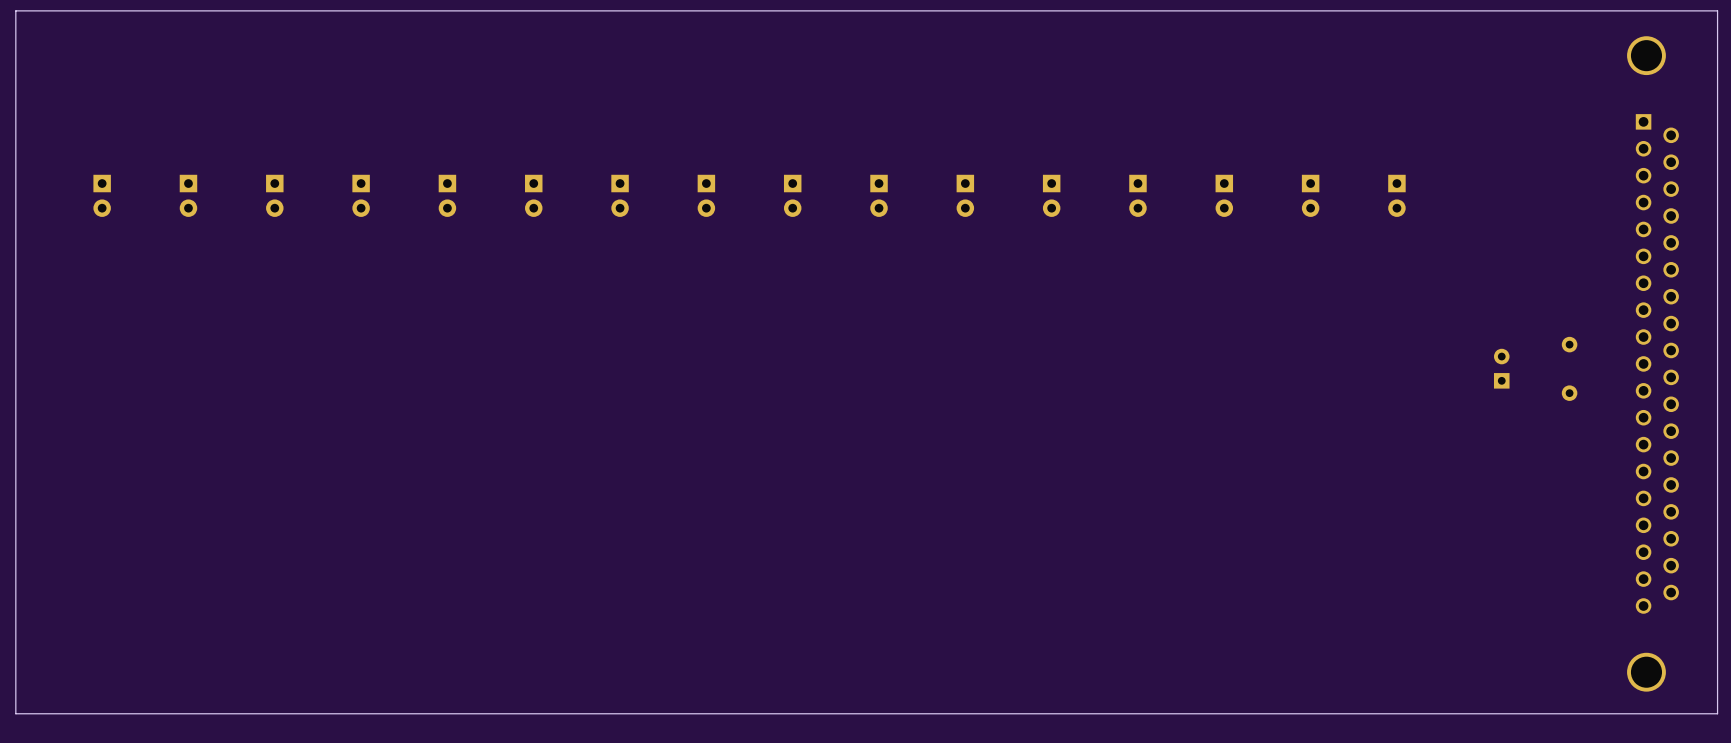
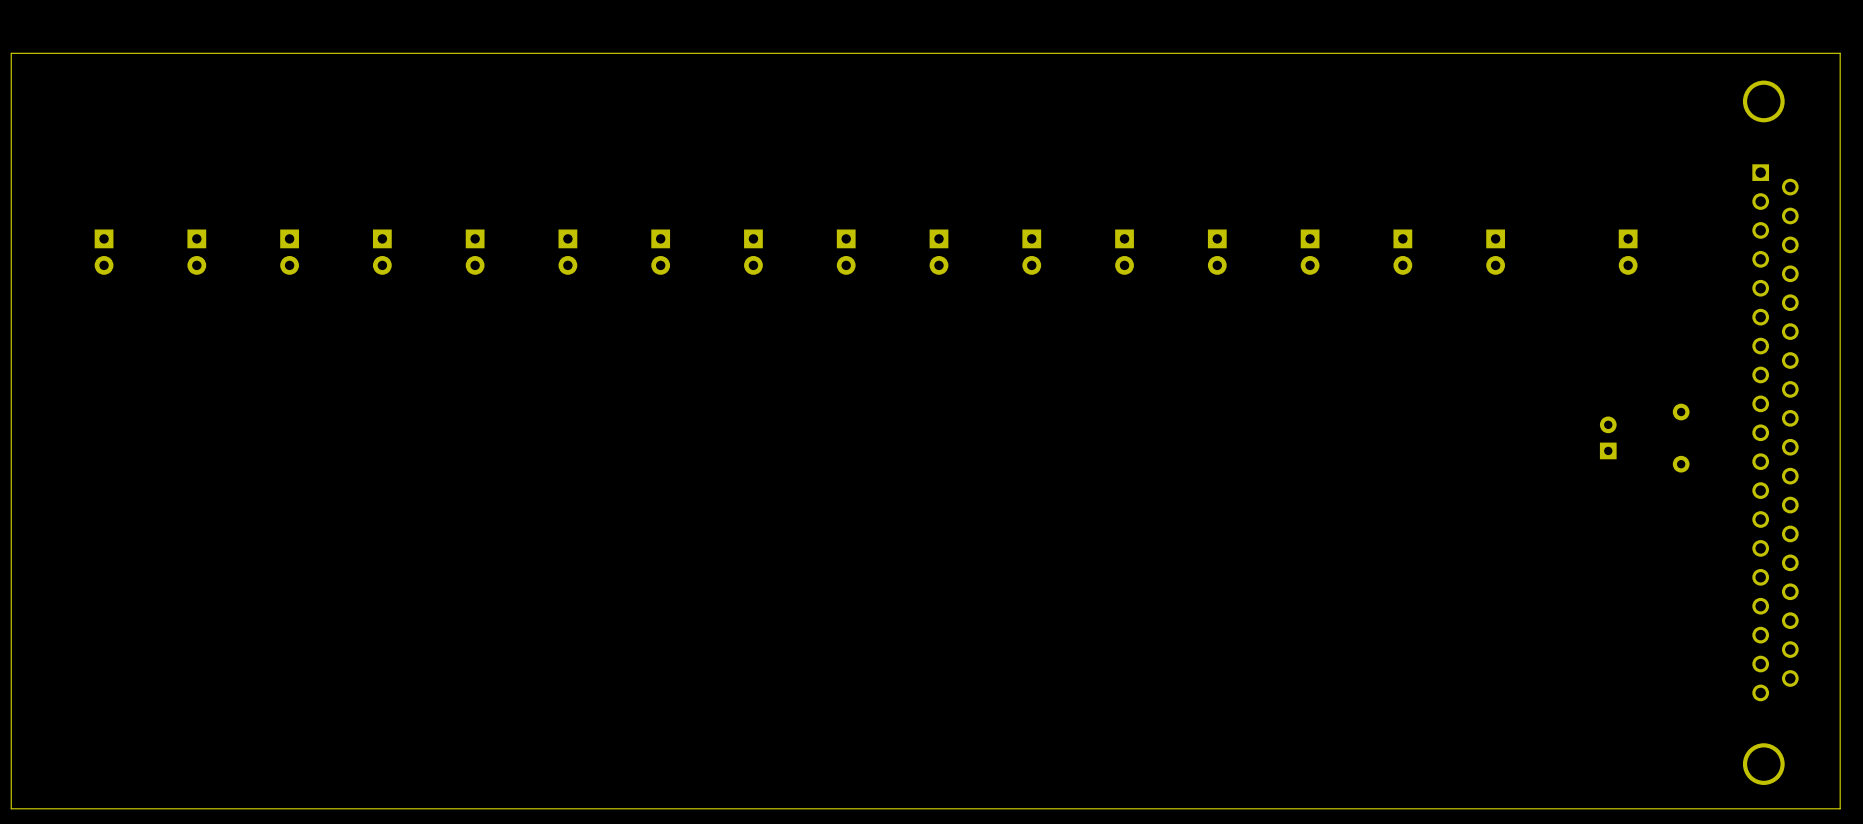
part: none -> (1628, 252)

